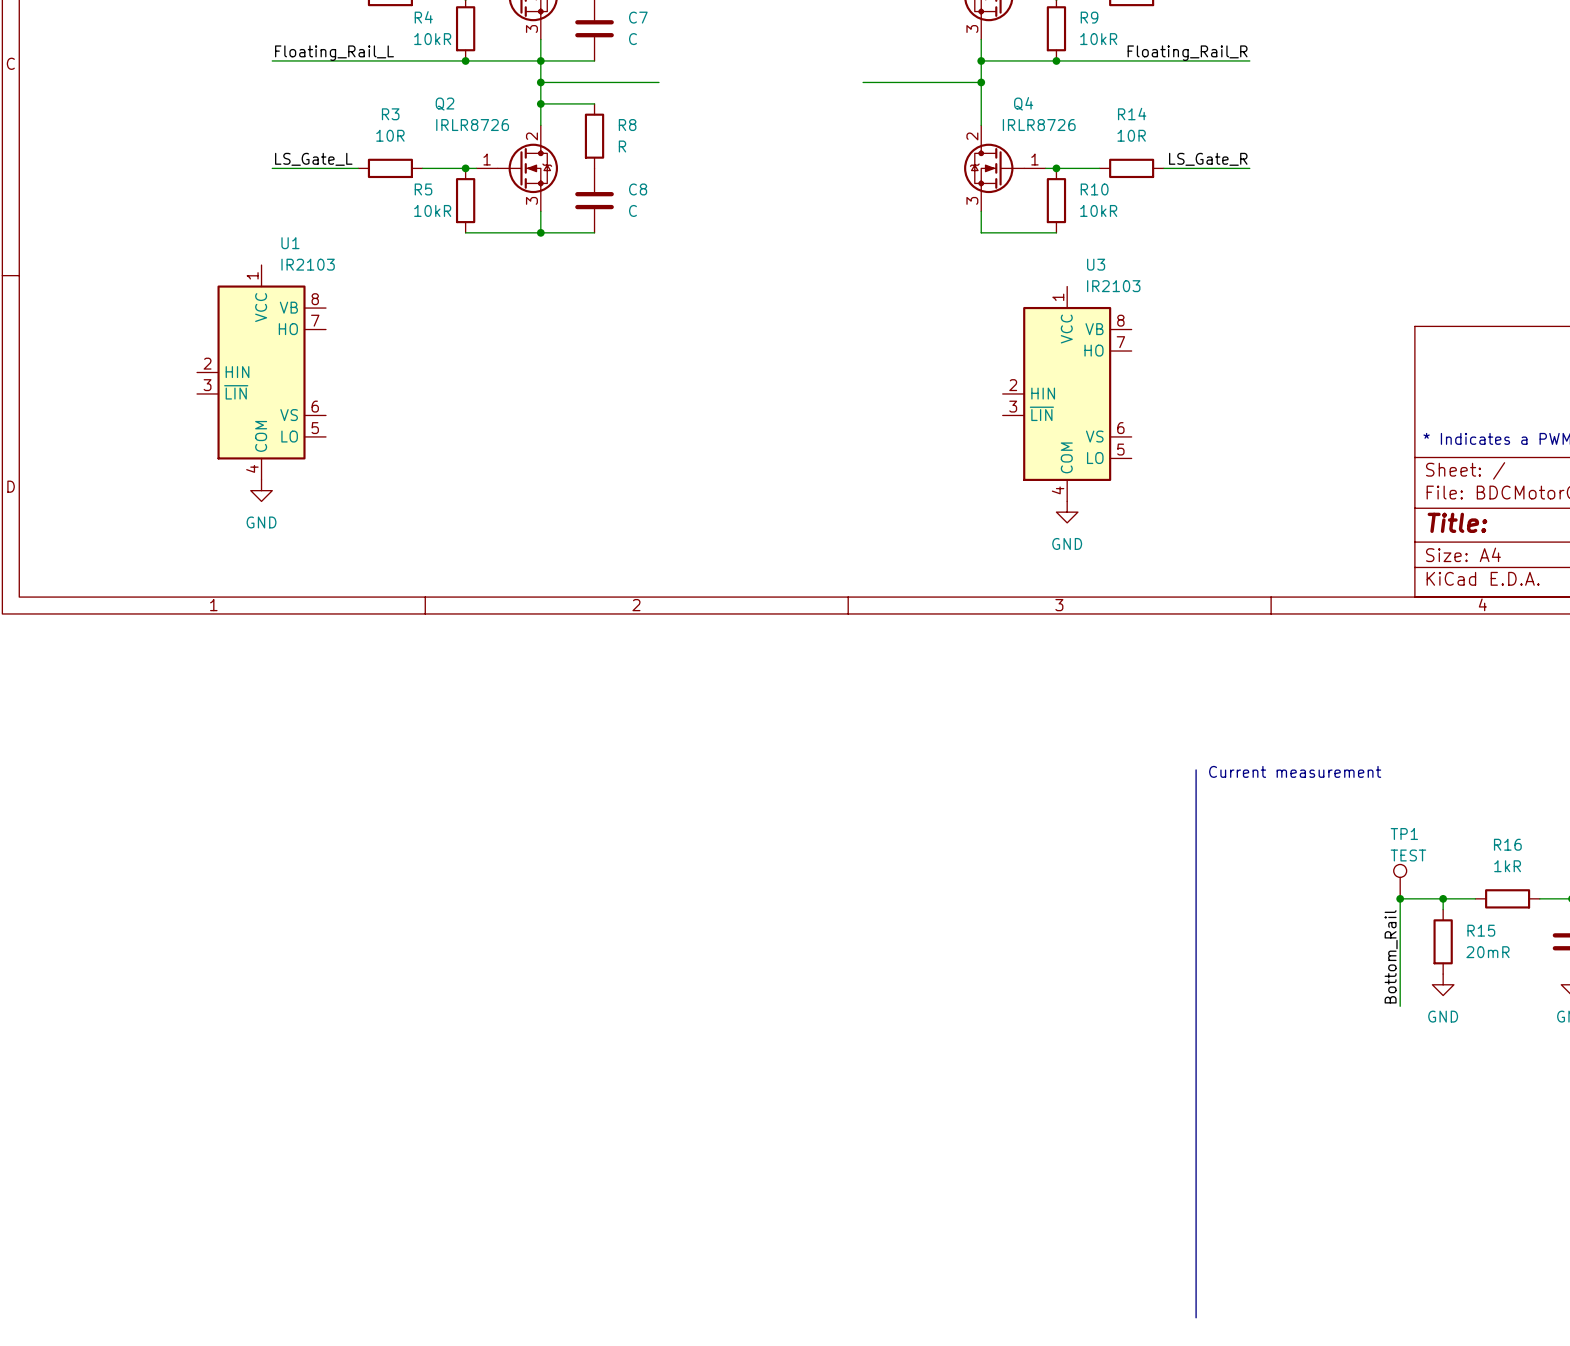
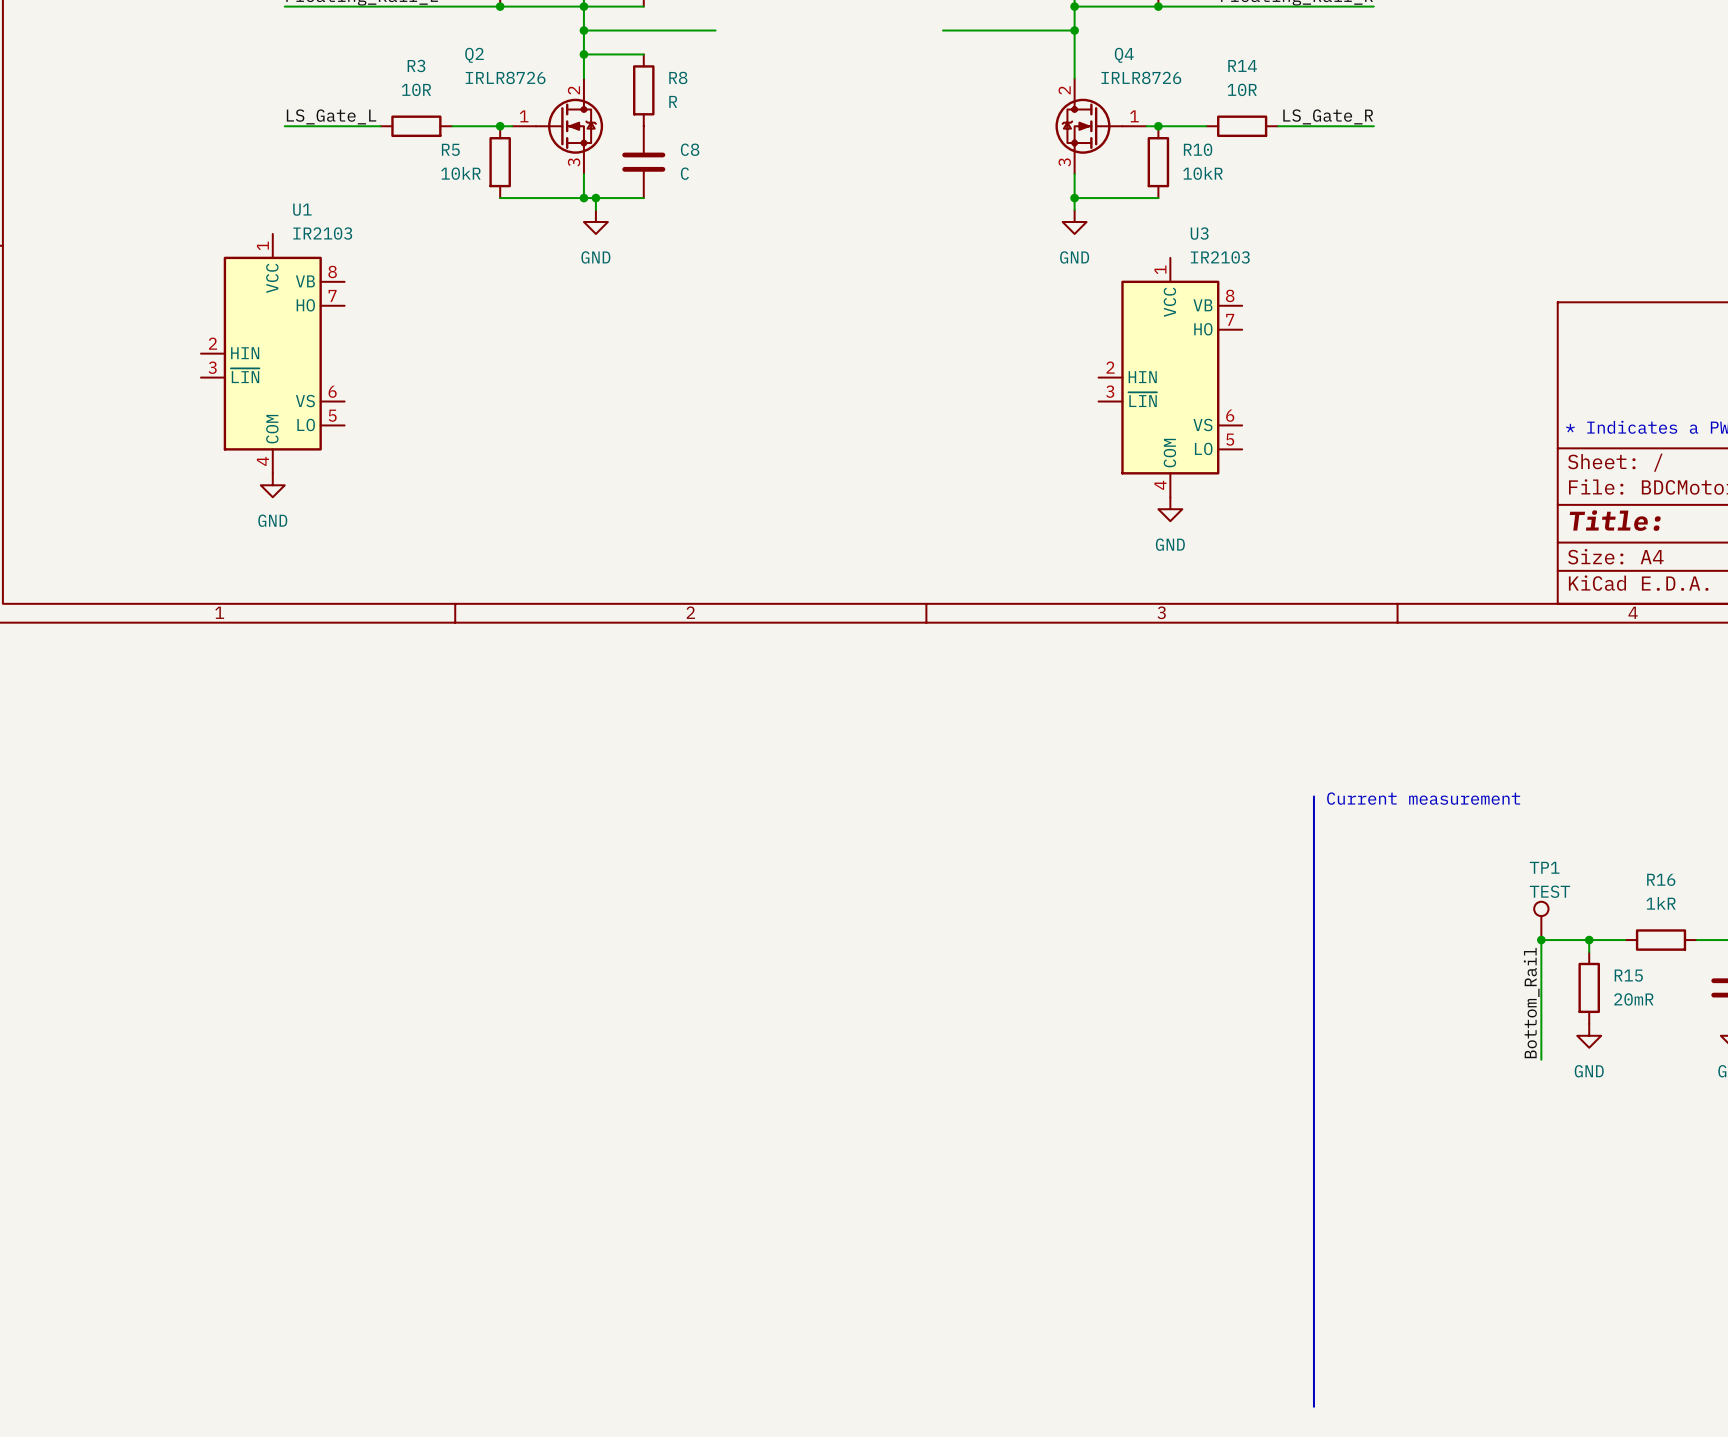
wire: none -> (595, 198) (595, 210)
junction: none -> (595, 198)
wire: none -> (1074, 198) (1074, 210)
junction: none -> (1074, 198)
power symbol: none -> GND (595, 222)
power symbol: none -> GND (1074, 222)

